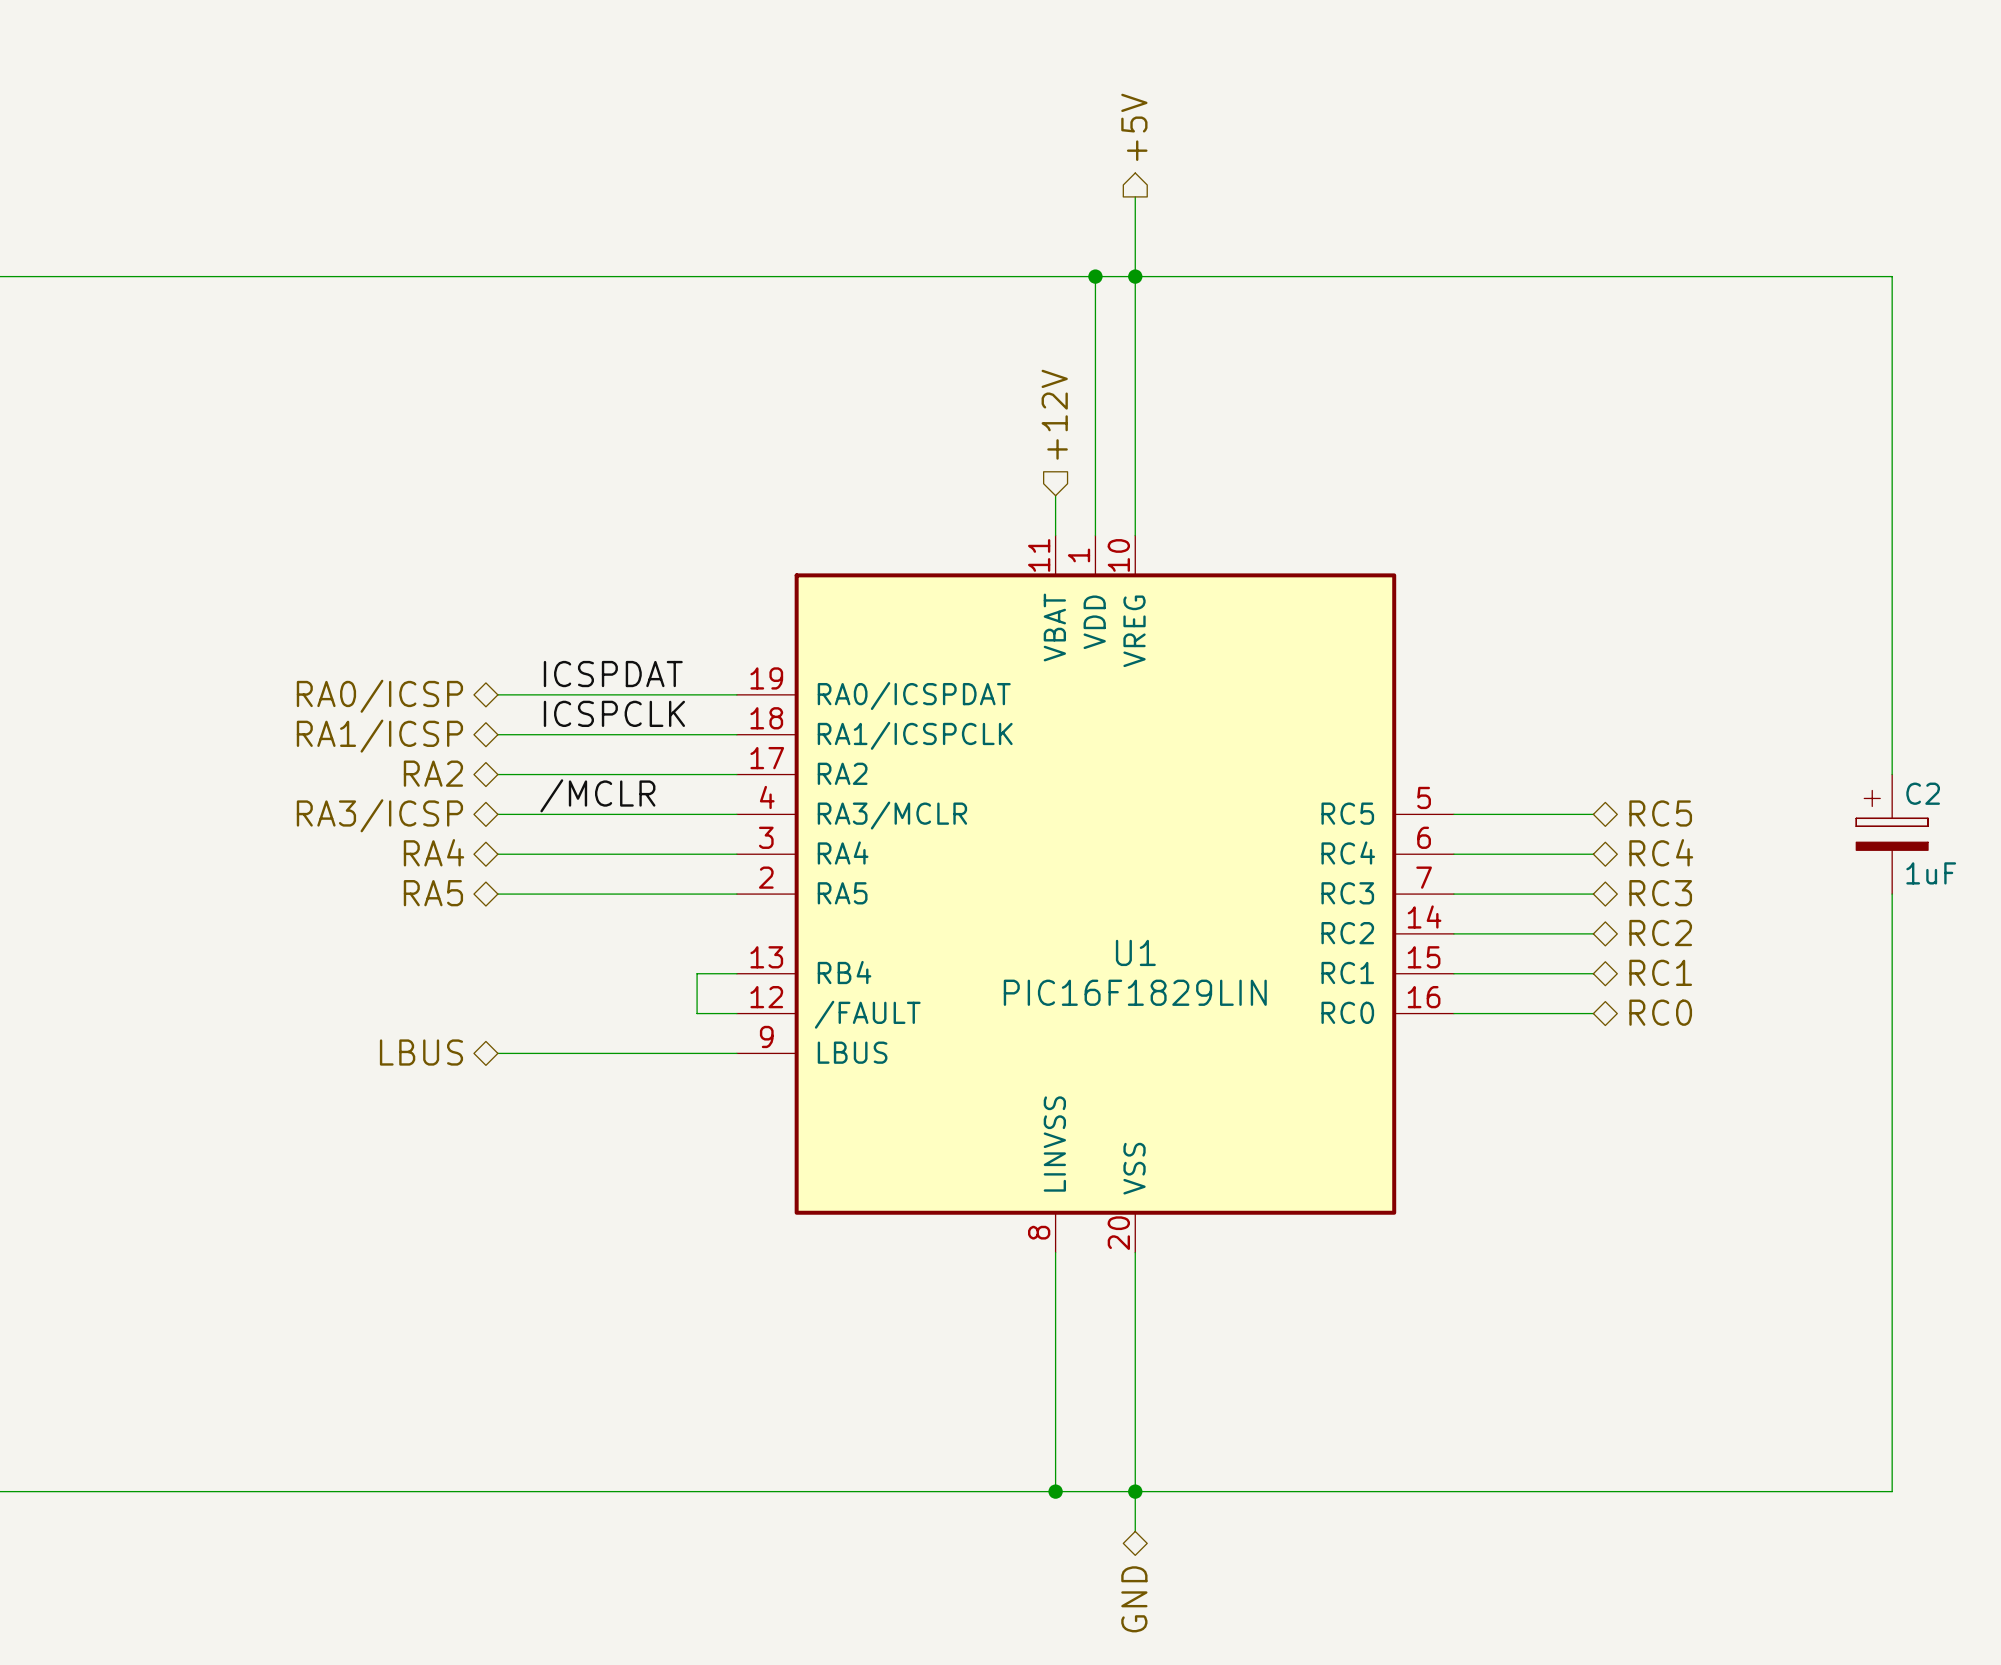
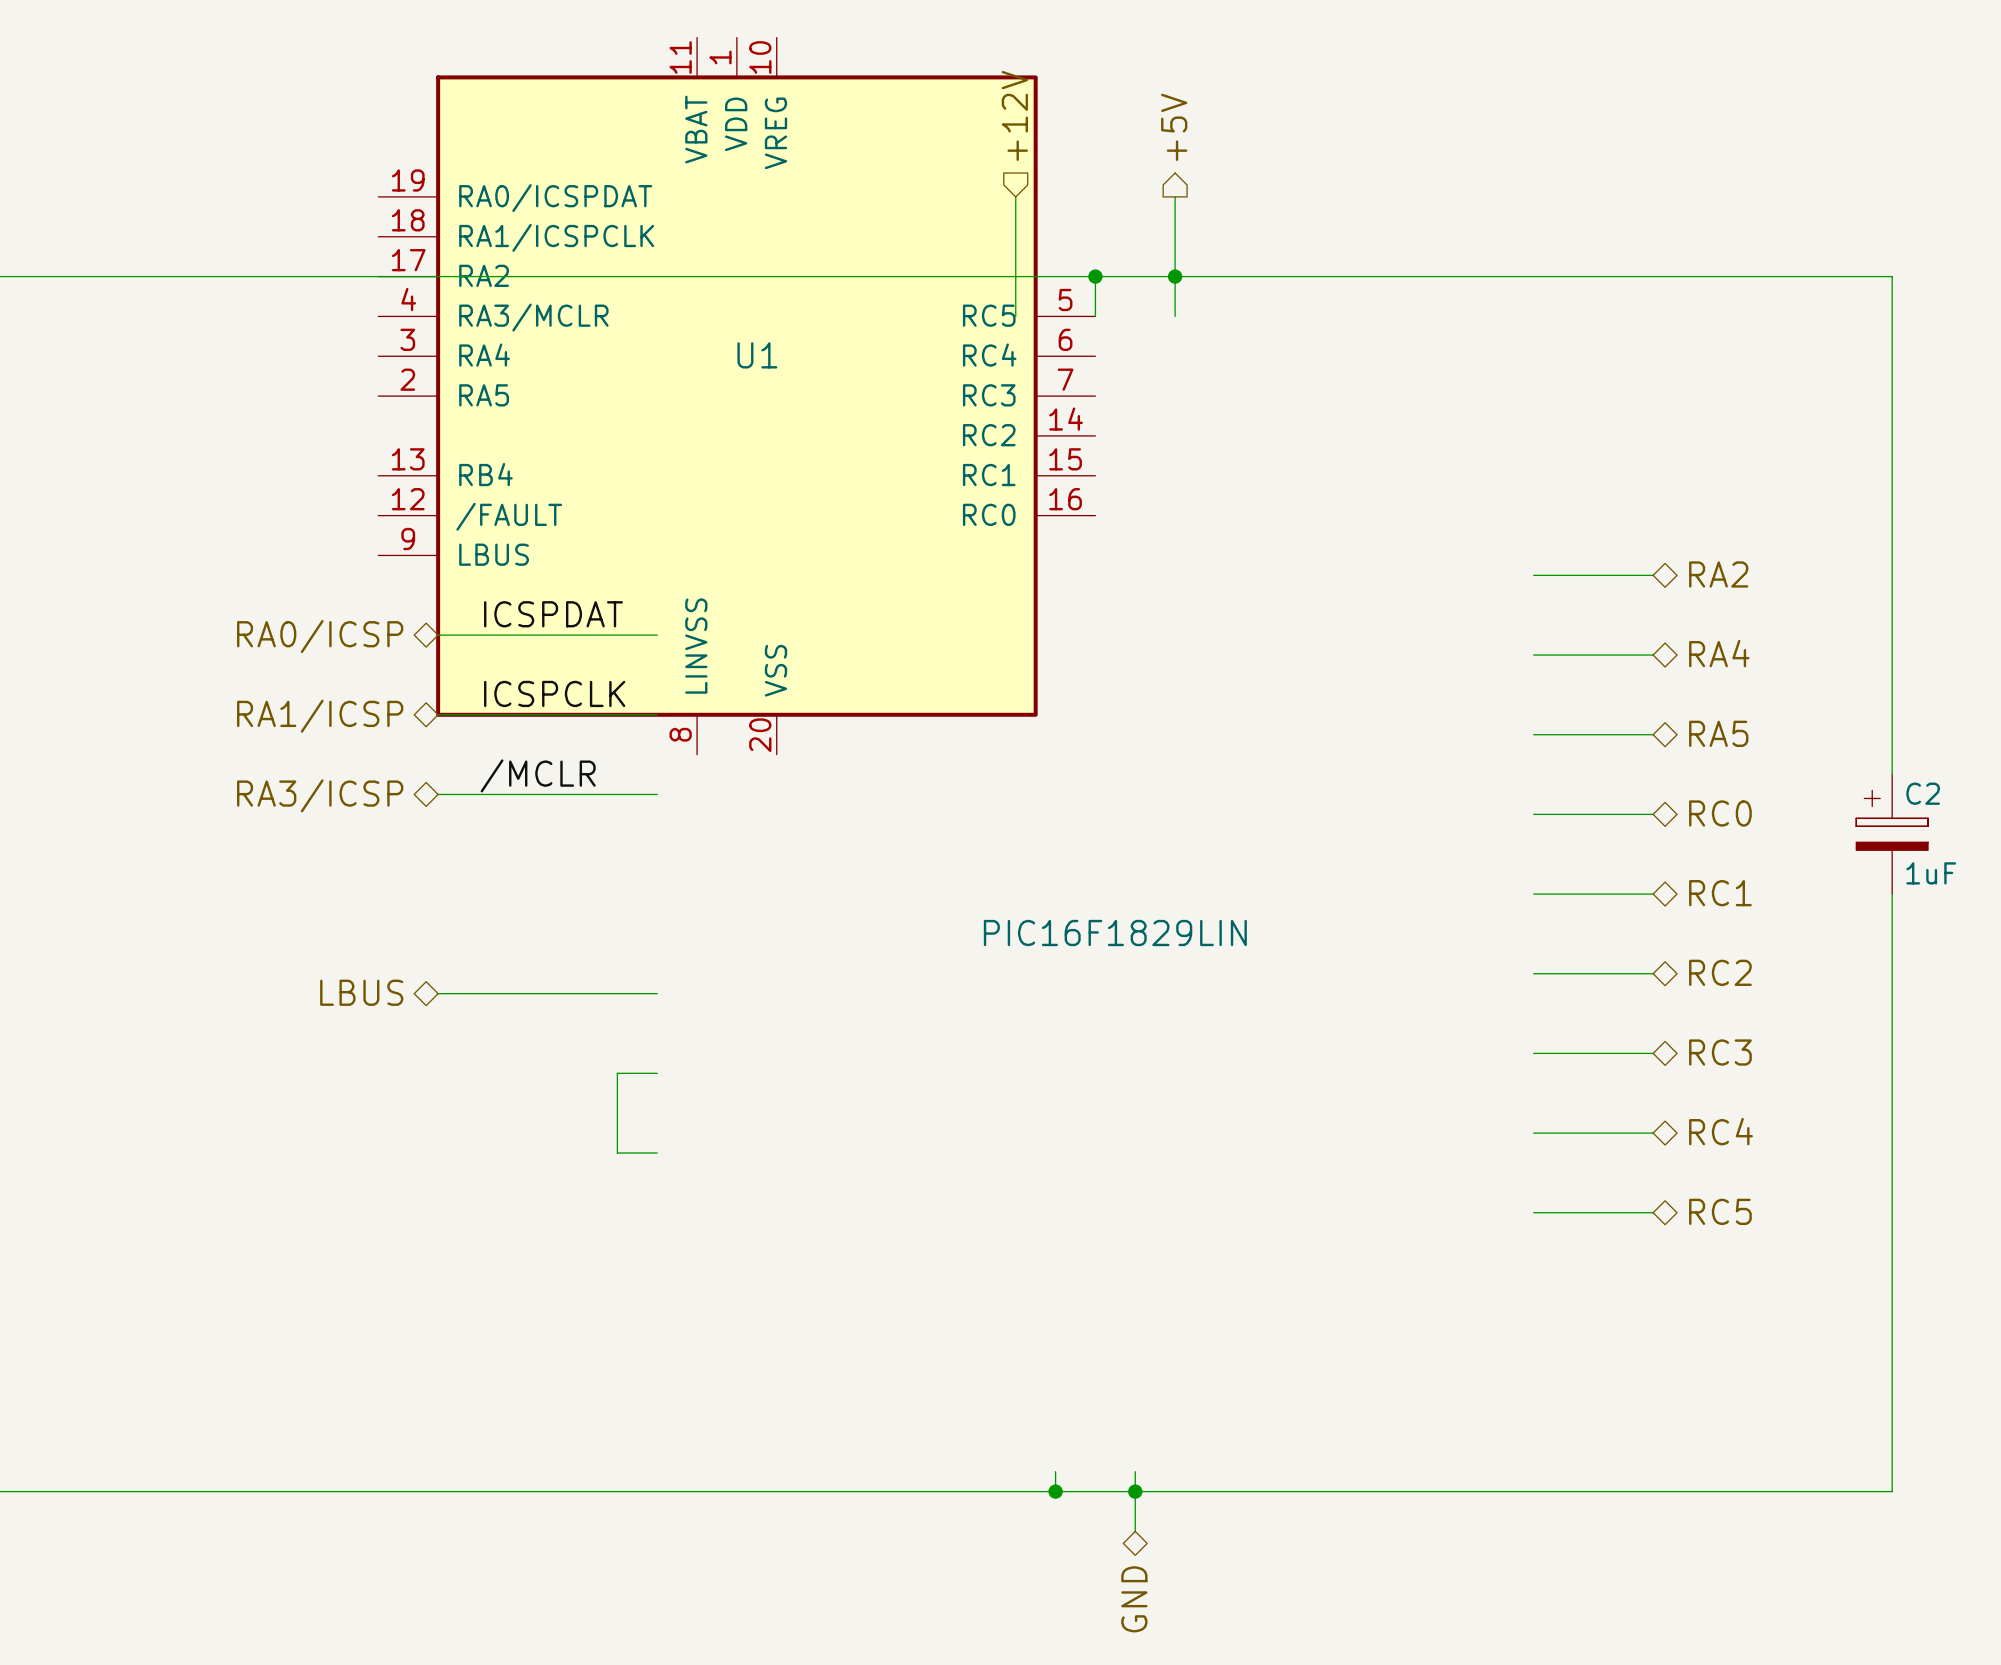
hierarchical label position: +5V (1134, 127) -> +5V (1174, 127)
wire: none -> (1015, 196) (1015, 316)
wire: (1135, 196) (1135, 535) -> none
wire: none -> (1175, 196) (1175, 316)
junction position: (1135, 276) -> (1175, 276)
wire: (1095, 316) (1095, 535) -> none
hierarchical label position: +12V (1054, 414) -> +12V (1014, 115)
wire: (1055, 495) (1055, 535) -> none
hierarchical label: none -> RA2 (1718, 574)
wire: none -> (1533, 575) (1653, 575)
wire: none -> (438, 635) (657, 635)
hierarchical label: none -> RA4 (1719, 653)
wire: none -> (1533, 655) (1653, 655)
label position: ICSPDAT (613, 674) -> ICSPDAT (553, 614)
hierarchical label position: RA0/ICSP (379, 696) -> RA0/ICSP (320, 636)
label position: ICSPCLK (614, 713) -> ICSPCLK (554, 693)
wire: none -> (438, 714) (657, 714)
hierarchical label: none -> RA5 (1718, 733)
wire: (497, 734) (736, 734) -> none
wire: none -> (1533, 734) (1653, 734)
hierarchical label position: RA1/ICSP (379, 736) -> RA1/ICSP (320, 716)
hierarchical label: RA2 (433, 773) -> none
wire: (497, 774) (736, 774) -> none
wire: none -> (438, 794) (657, 794)
label position: /MCLR (597, 795) -> /MCLR (538, 775)
hierarchical label: RC5 (1660, 813) -> none
wire: (497, 814) (736, 814) -> none
wire: (1453, 814) (1533, 814) -> none
wire: none -> (1593, 814) (1653, 814)
hierarchical label position: RA3/ICSP (379, 815) -> RA3/ICSP (320, 795)
hierarchical label: RA4 (433, 852) -> none
hierarchical label position: RC4 (1661, 852) -> RC4 (1721, 1131)
wire: (497, 854) (736, 854) -> none
wire: (1453, 854) (1593, 854) -> none
hierarchical label: RA5 (433, 893) -> none
hierarchical label position: RC3 (1660, 893) -> RC3 (1720, 1052)
wire: (497, 894) (736, 894) -> none
U1 position: (1095, 894) -> (736, 396)
wire: (1453, 894) (1533, 894) -> none
wire: none -> (1593, 894) (1653, 894)
wire: (1453, 933) (1593, 933) -> none
hierarchical label position: RC2 (1660, 933) -> RC2 (1720, 972)
U1 name position: U1 (1135, 952) -> U1 (757, 355)
hierarchical label position: RC1 (1660, 972) -> RC1 (1720, 893)
wire: (736, 973) (697, 973) (697, 1013) (736, 1013) -> none
wire: (1453, 973) (1533, 973) -> none
wire: none -> (1593, 973) (1653, 973)
U1 value position: PIC16F1829LIN (1135, 992) -> PIC16F1829LIN (1115, 933)
wire: none -> (438, 993) (657, 993)
hierarchical label position: RC0 (1660, 1012) -> RC0 (1720, 813)
wire: (1453, 1013) (1593, 1013) -> none
hierarchical label position: LBUS (421, 1052) -> LBUS (361, 992)
wire: (497, 1053) (736, 1053) -> none
wire: none -> (1533, 1053) (1653, 1053)
wire: none -> (657, 1073) (617, 1073) (617, 1153) (657, 1153)
wire: none -> (1533, 1133) (1653, 1133)
hierarchical label: none -> RC5 (1720, 1211)
wire: none -> (1533, 1212) (1653, 1212)
wire: (1055, 1252) (1055, 1471) -> none
wire: (1135, 1252) (1135, 1471) -> none

